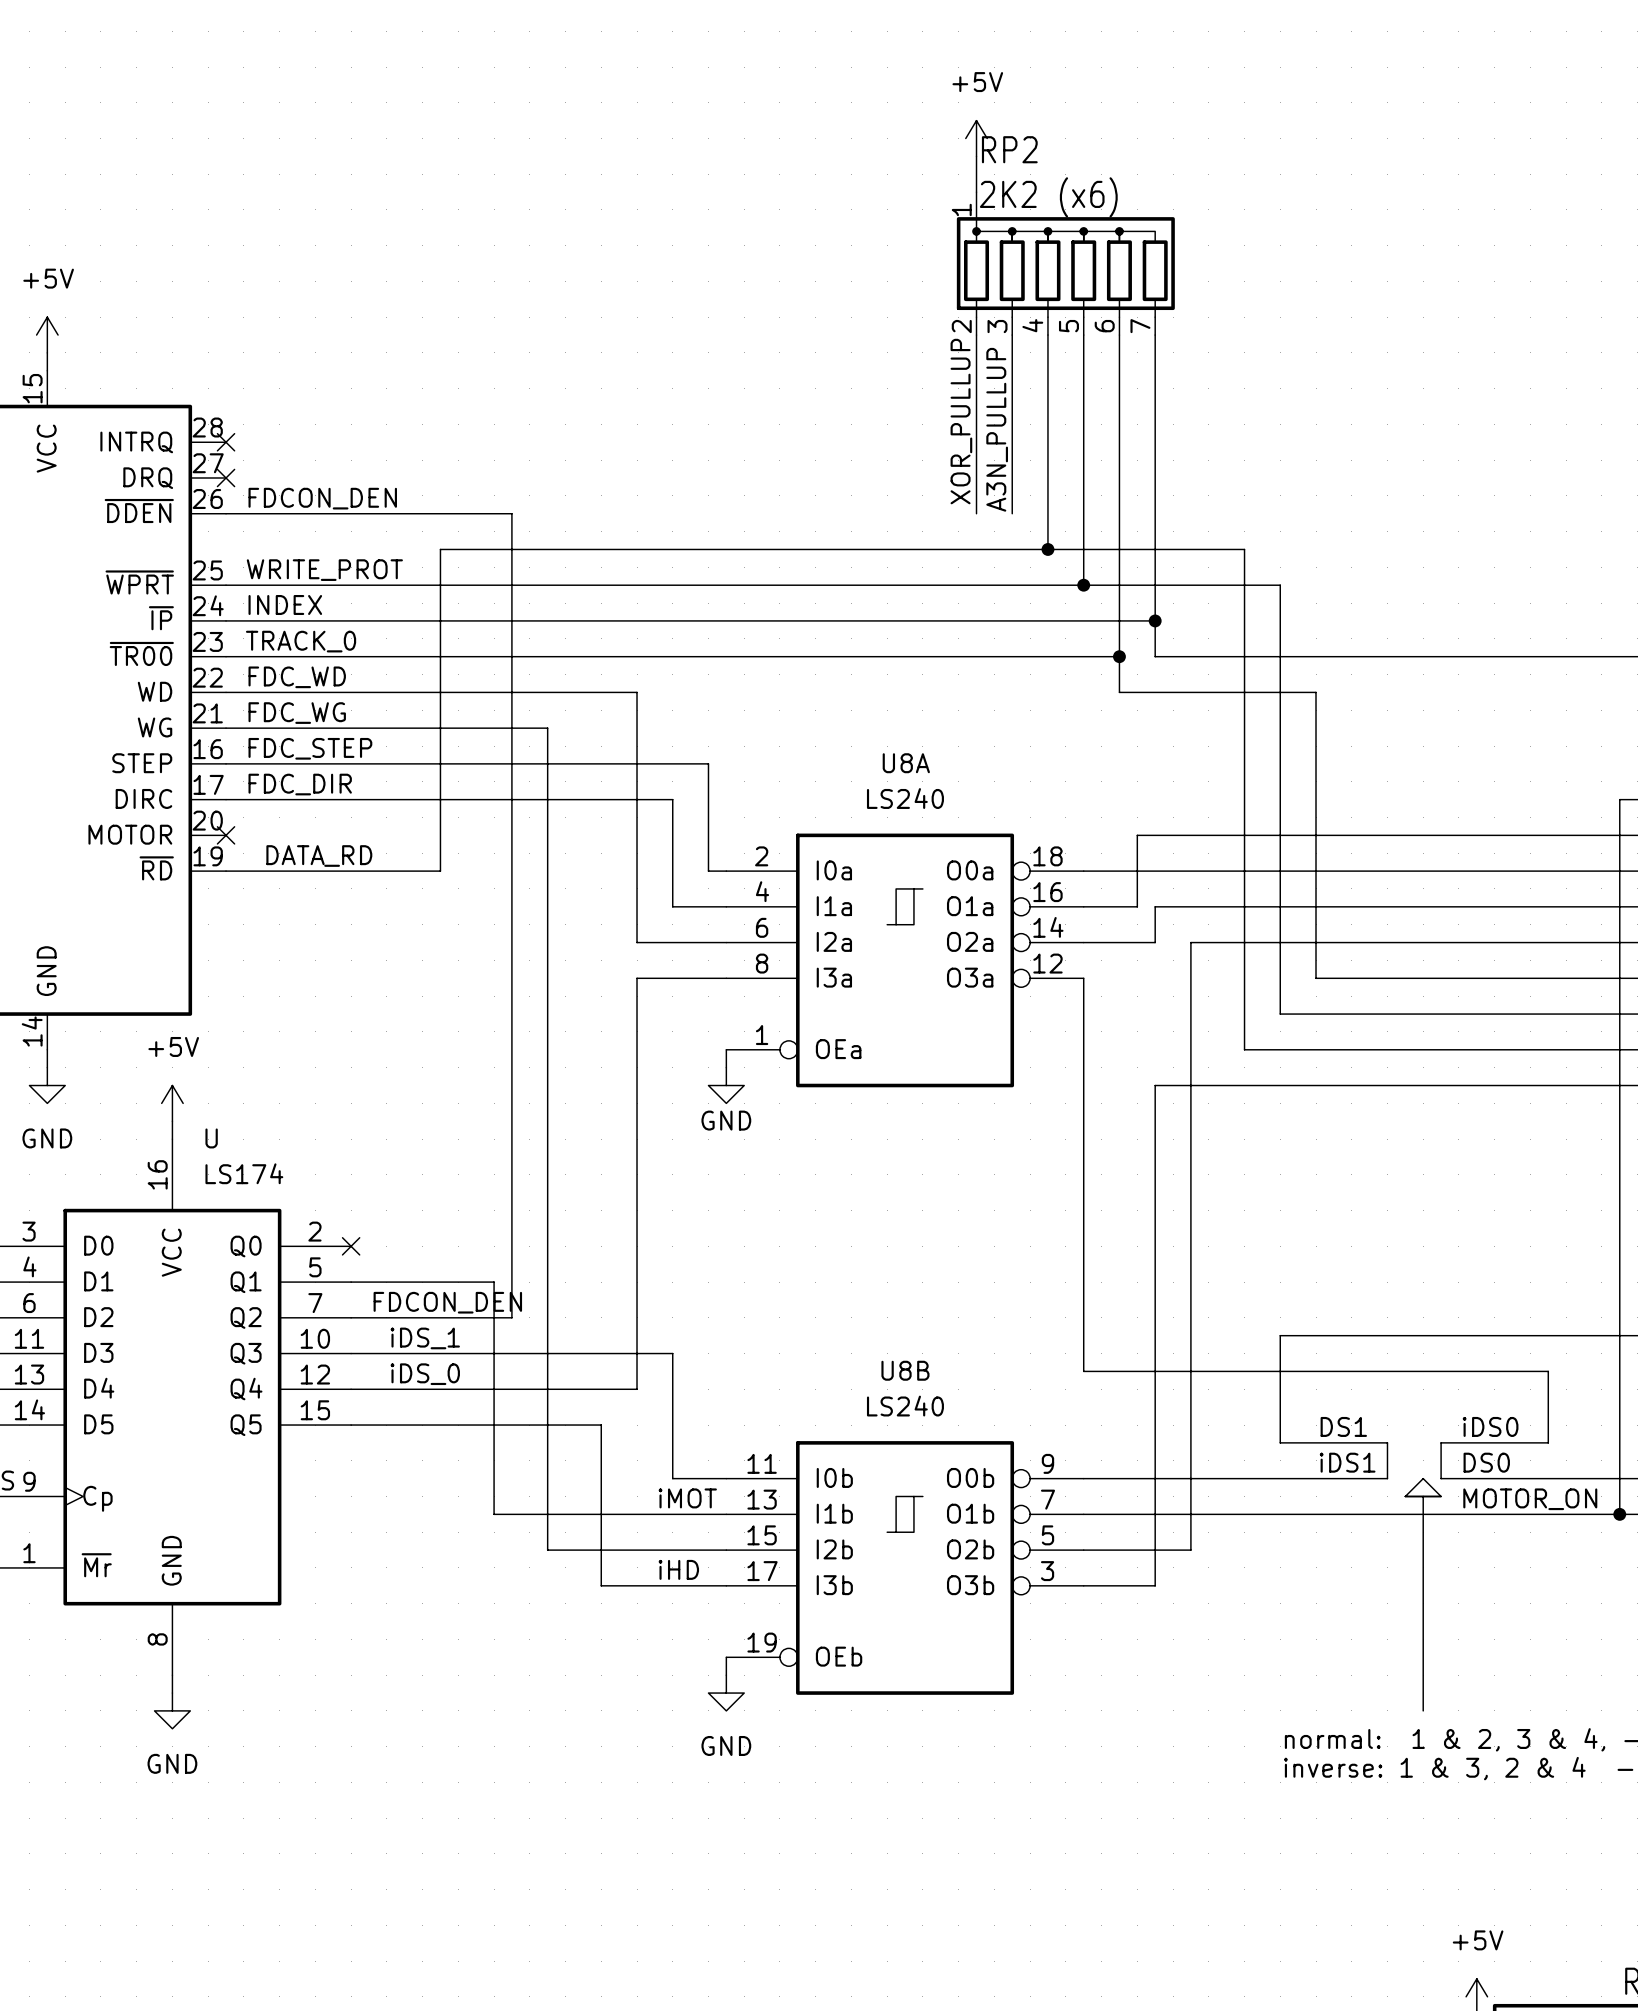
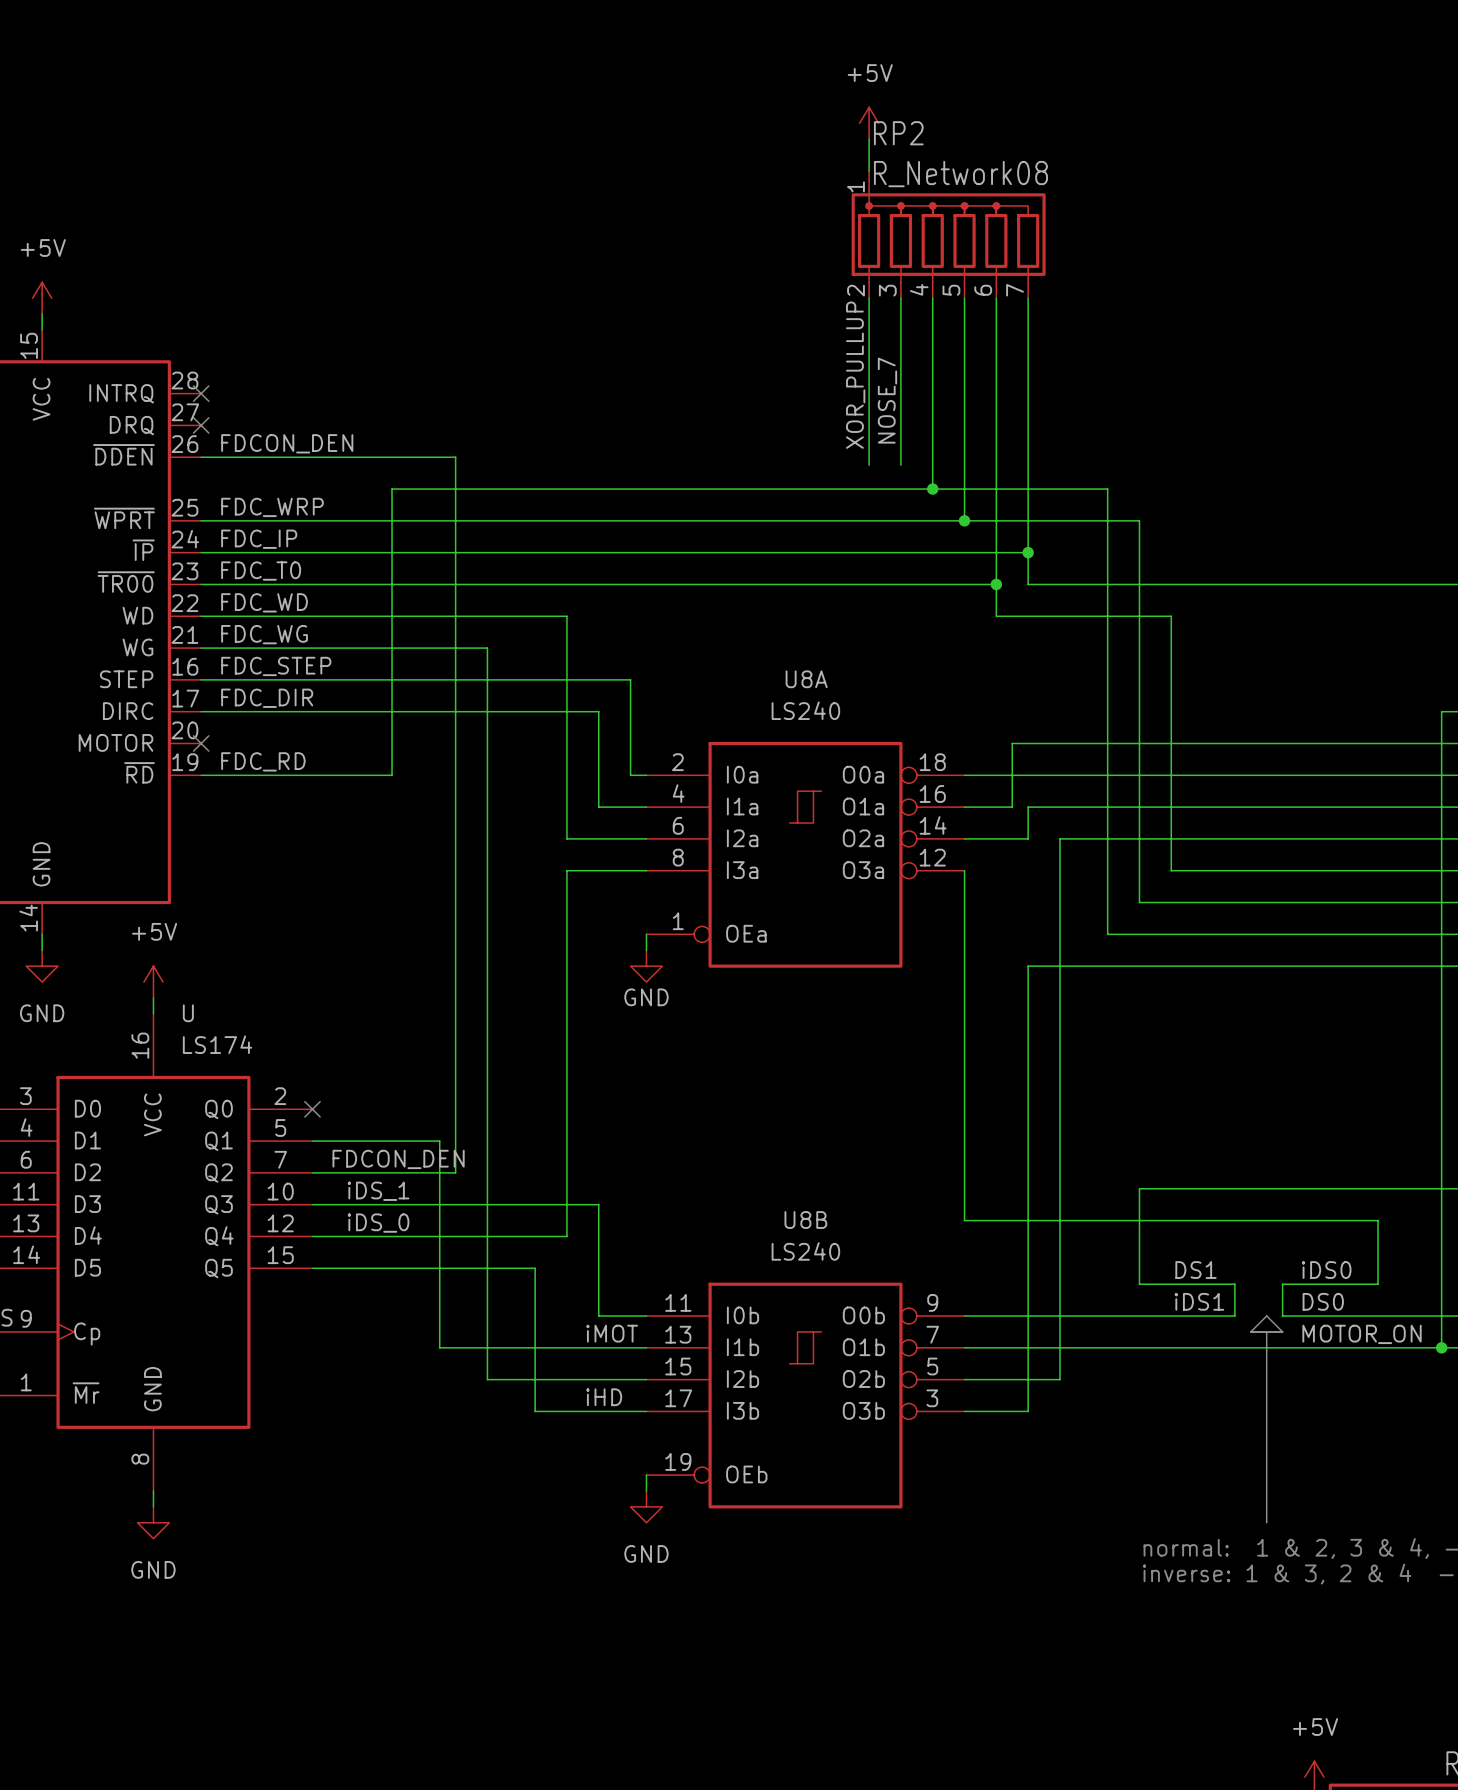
RP2 value: 2K2 (x6) (1048, 197) -> R_Network08 (960, 174)
label: A3N_PULLUP (997, 429) -> NOSE_7 (887, 400)
wire: none -> (869, 457) (869, 465)
wire: none -> (900, 457) (900, 465)
label: WRITE_PROT (324, 570) -> FDC_WRP (272, 507)
label: INDEX (285, 604) -> FDC_IP (259, 539)
label: TRACK_0 (301, 641) -> FDC_T0 (261, 571)
label: DATA_RD (319, 856) -> FDC_RD (263, 761)

